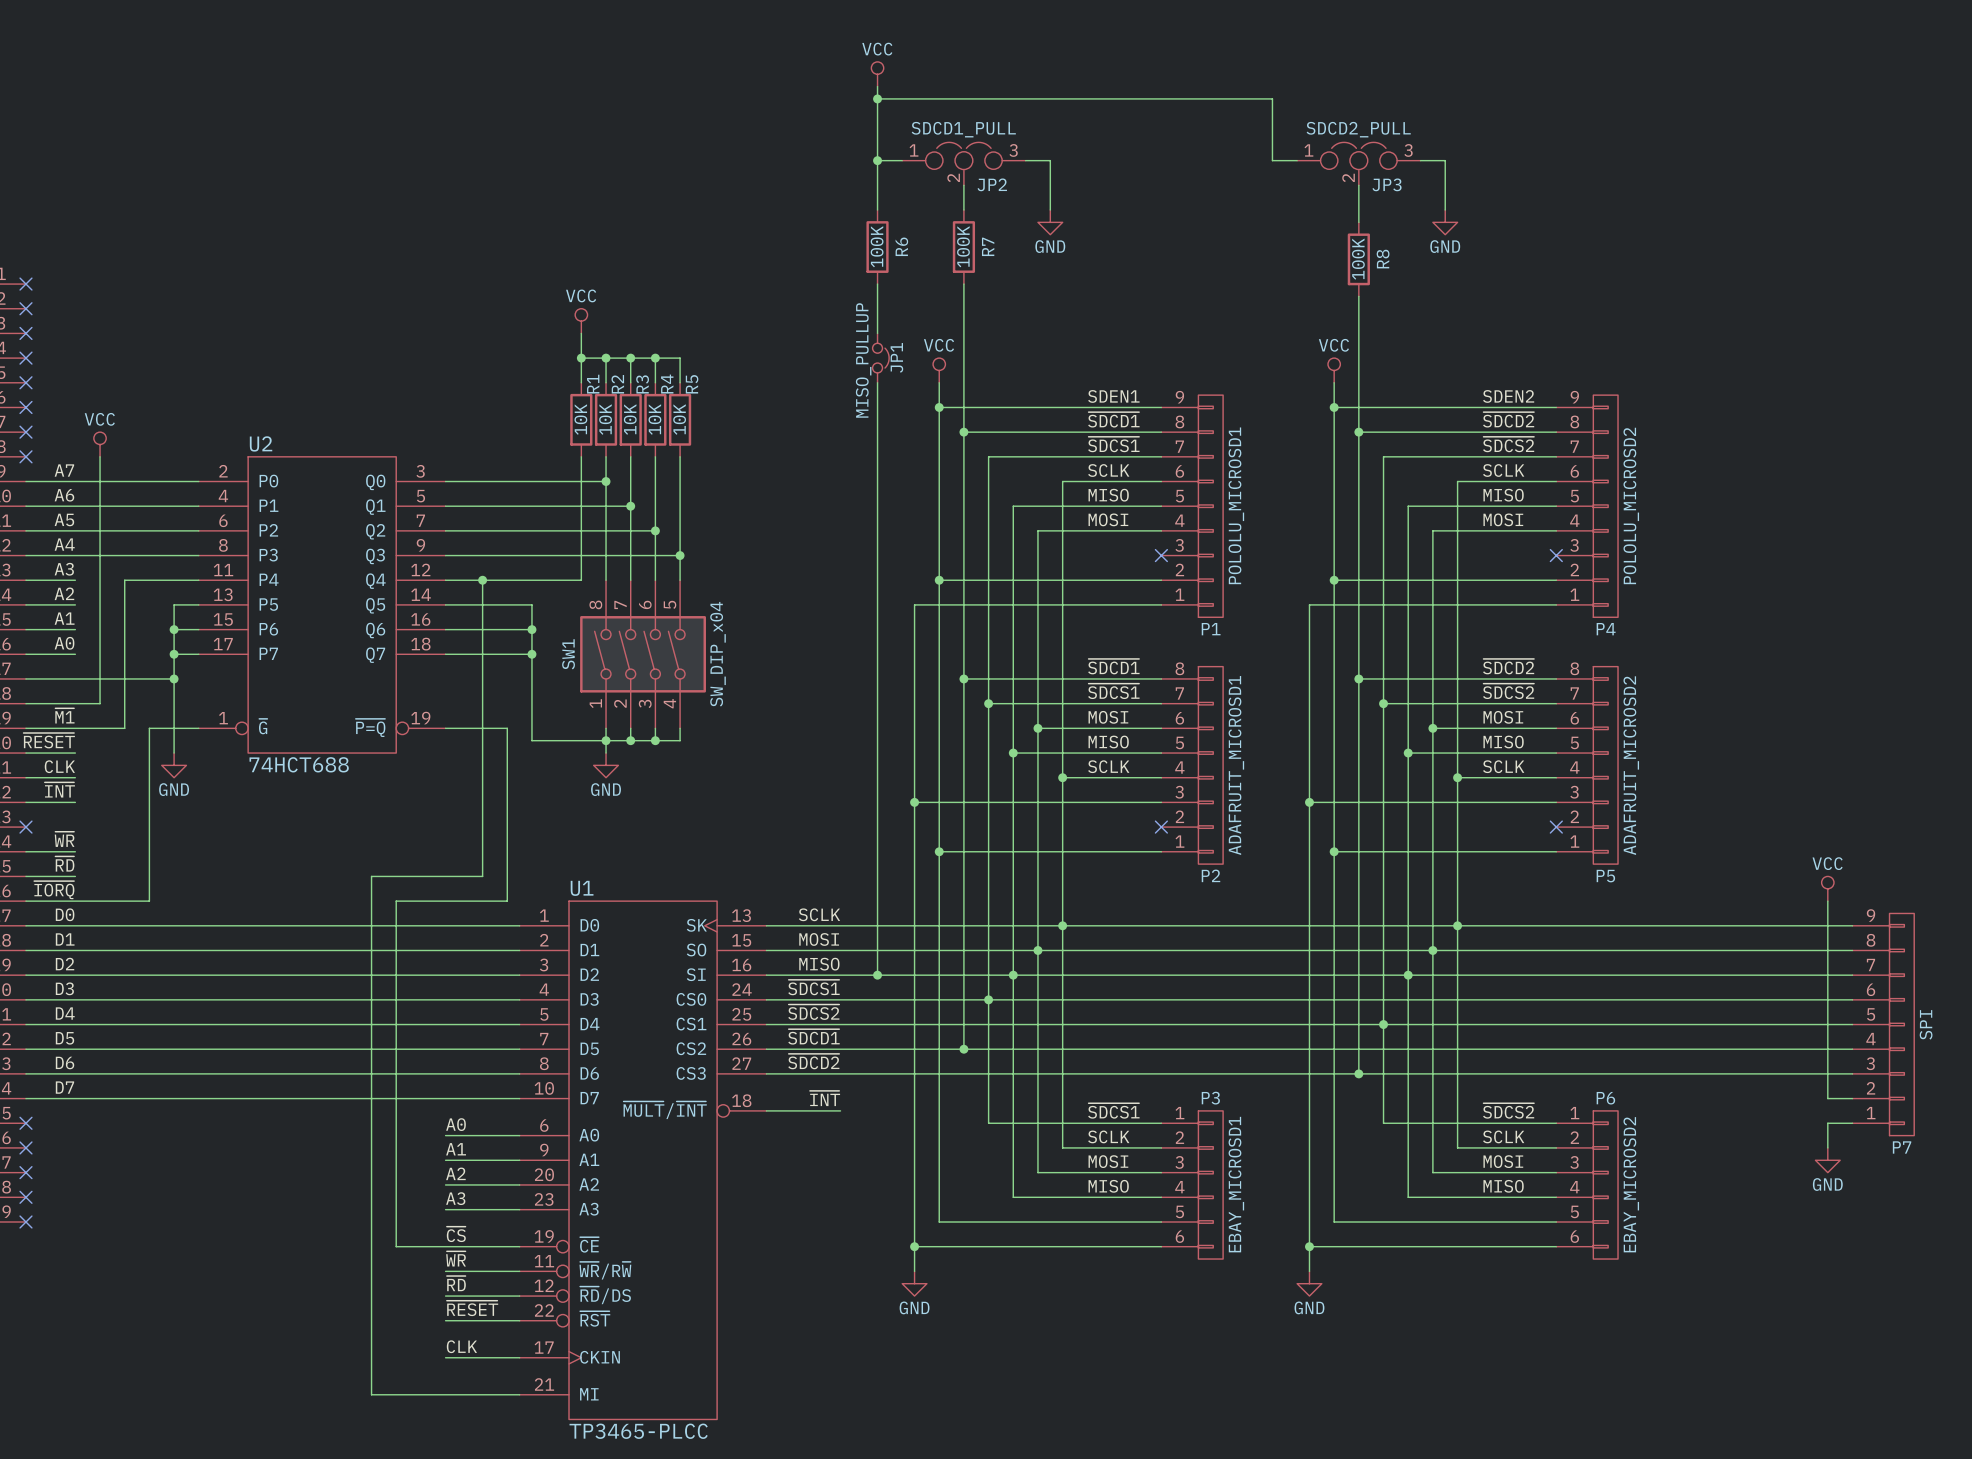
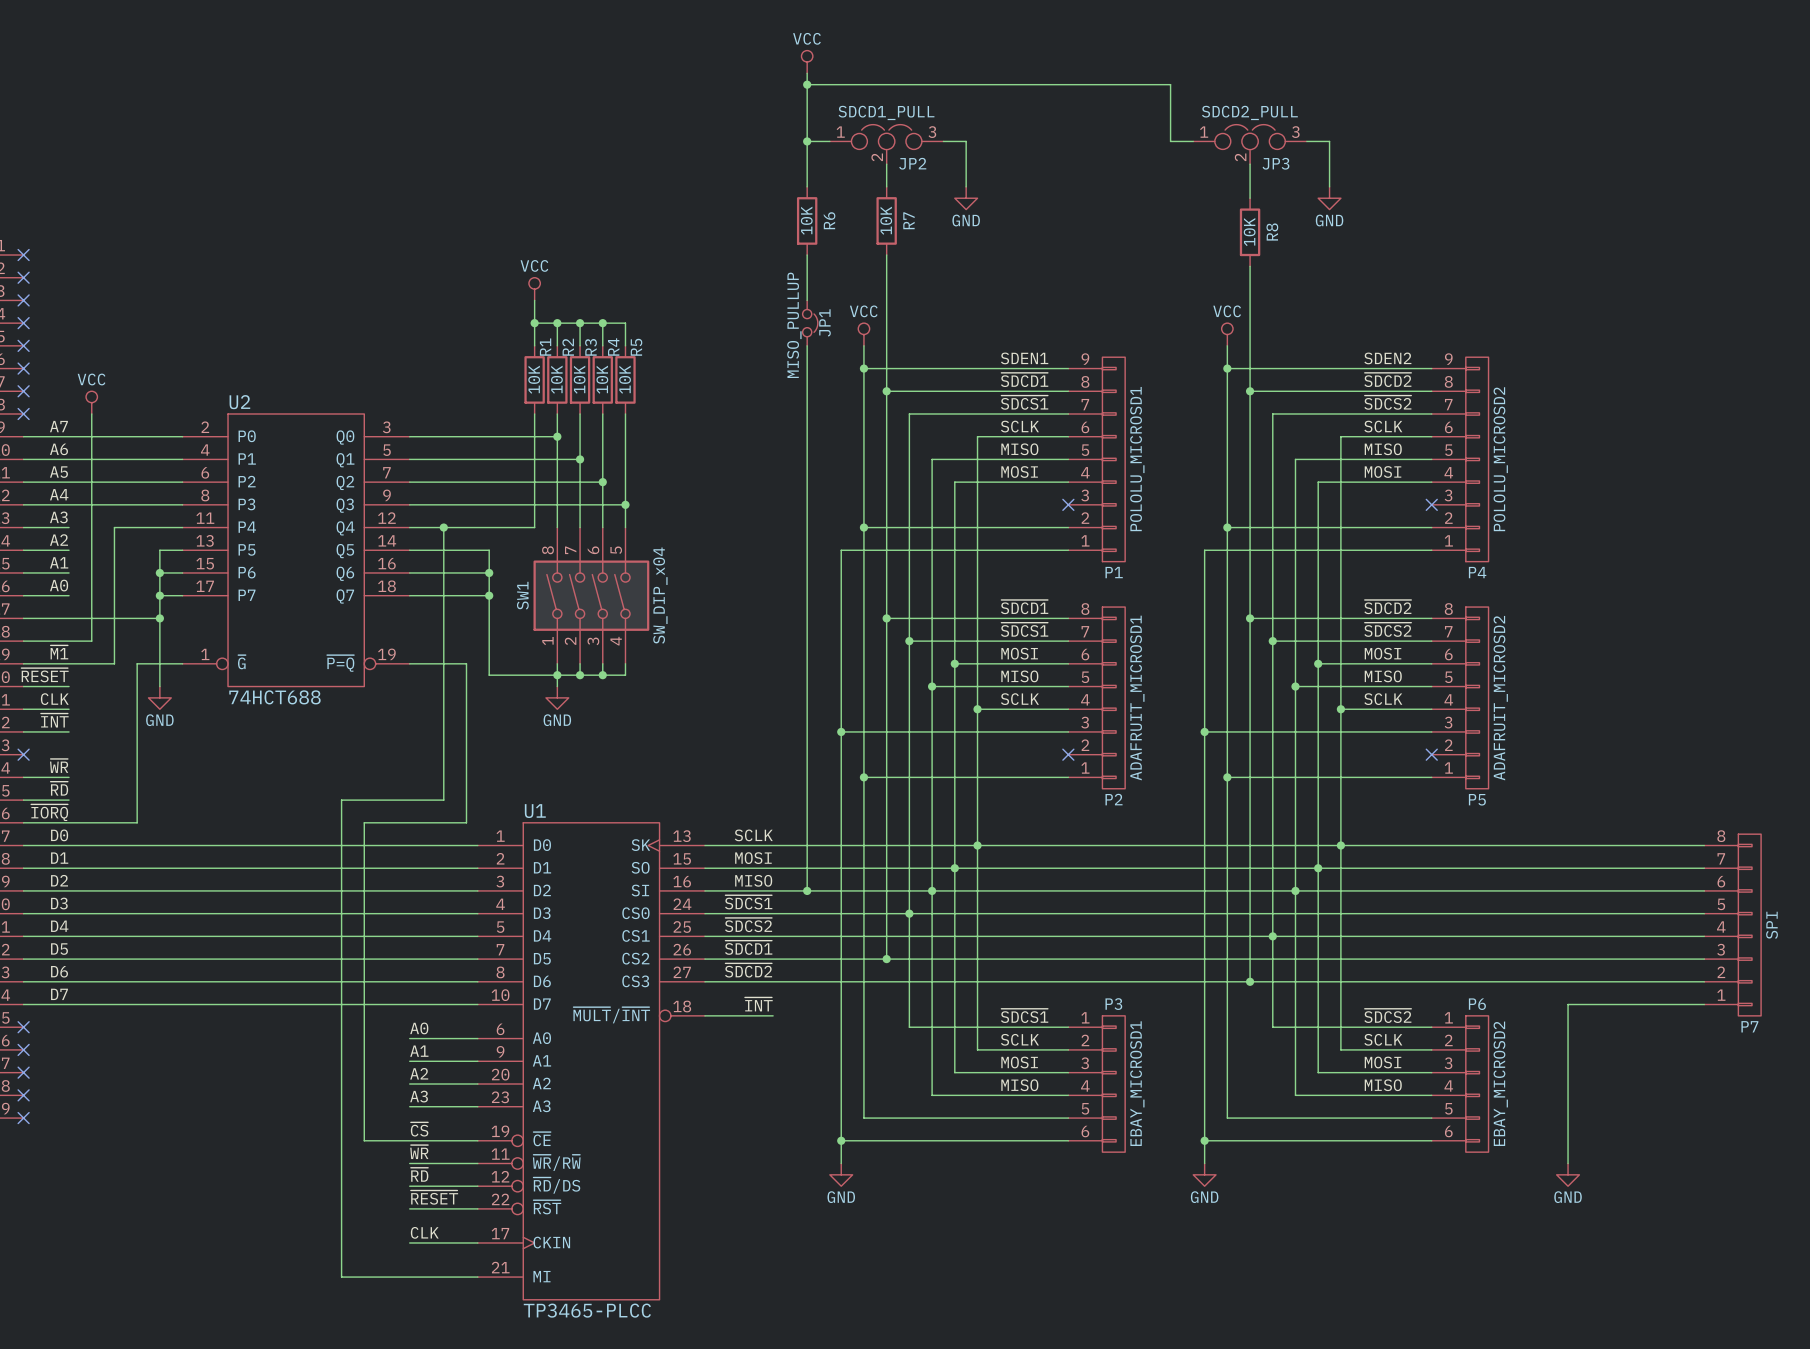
R6 value: 100K (877, 246) -> 10K (806, 220)
R7 value: 100K (963, 246) -> 10K (886, 220)
R8 value: 100K (1358, 259) -> 10K (1249, 232)
power symbol: VCC (1827, 888) -> none
wire: (1827, 901) (1827, 1098) -> (1568, 1163) (1568, 1004) (1681, 1004)
P7 symbol: [1852, 913, 1915, 1136] -> [1704, 834, 1762, 1016]
wire: (1852, 1123) (1827, 1123) (1827, 1147) -> none
power symbol position: GND (1827, 1160) -> GND (1568, 1174)

